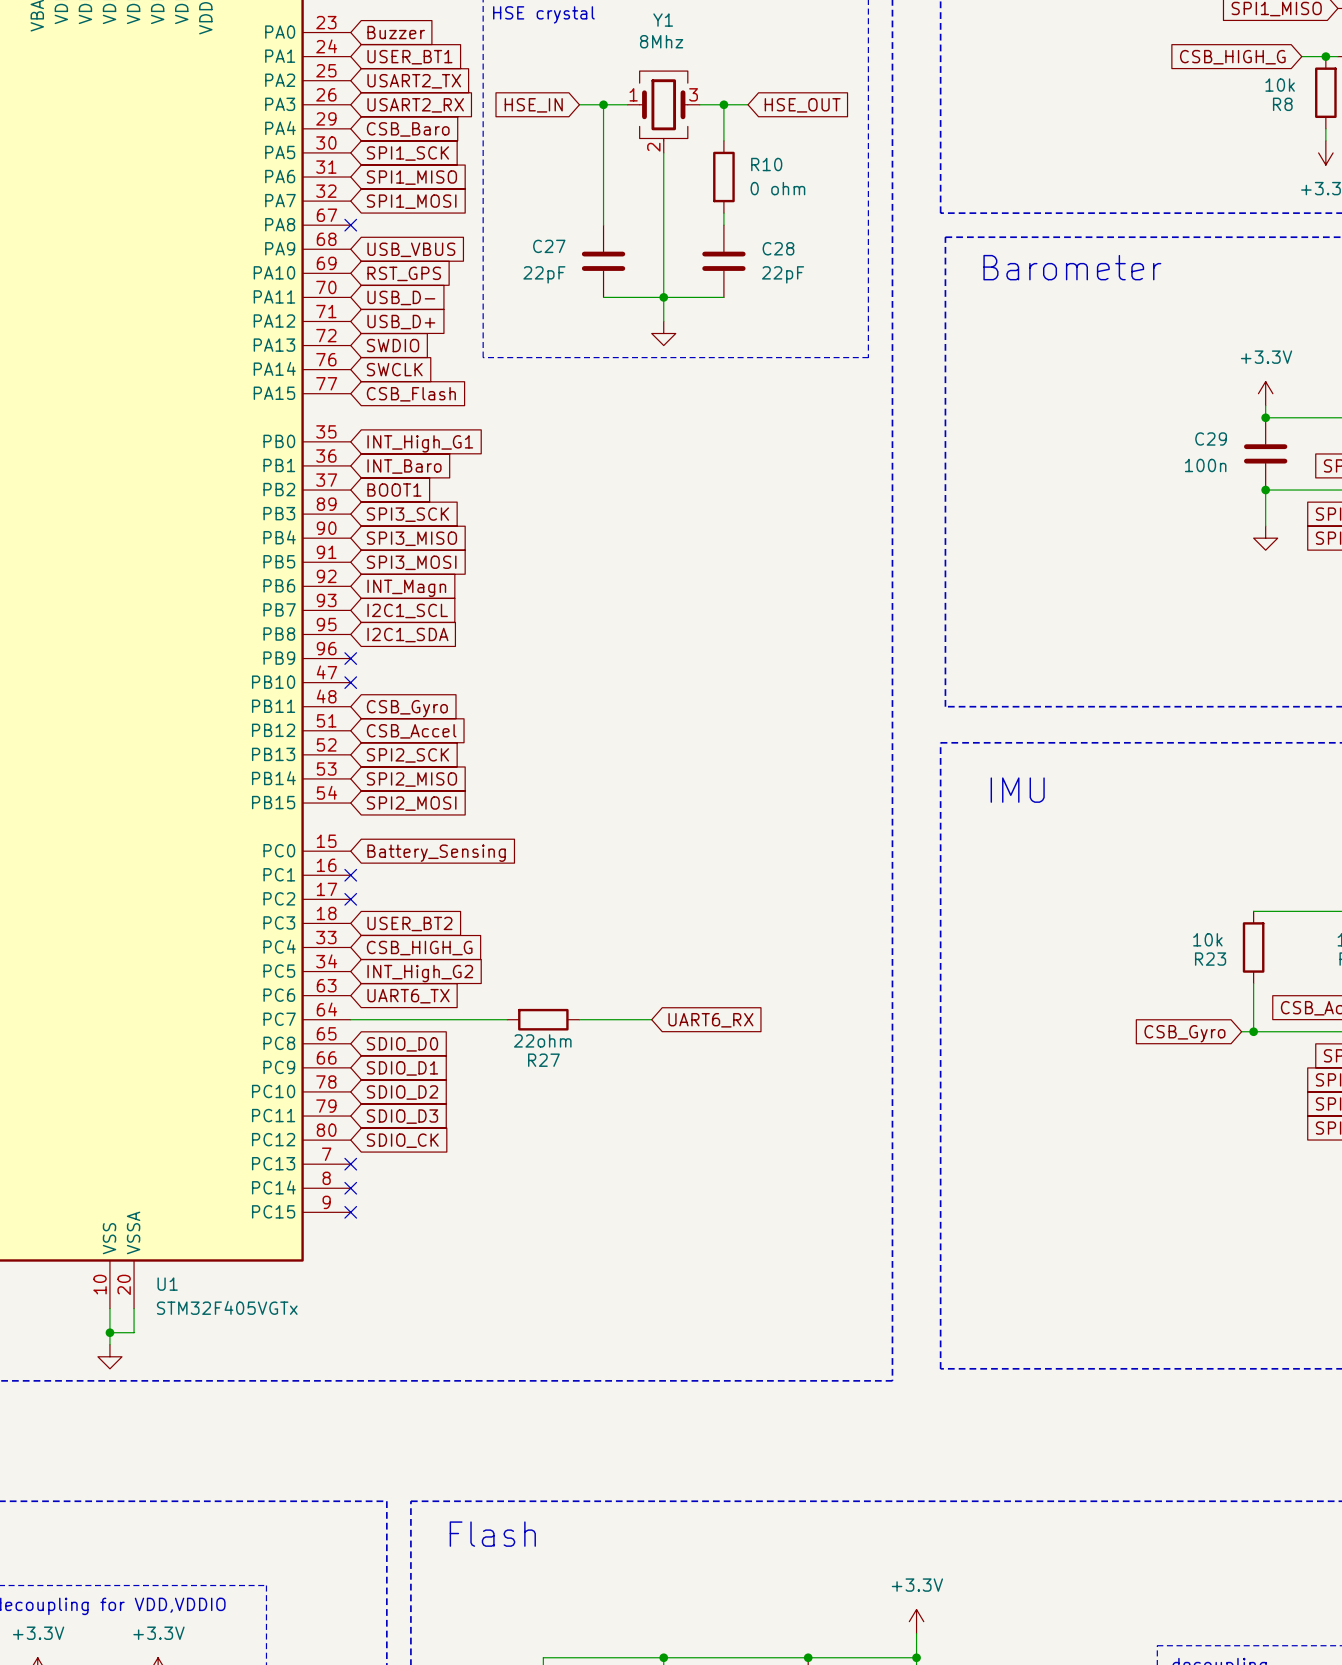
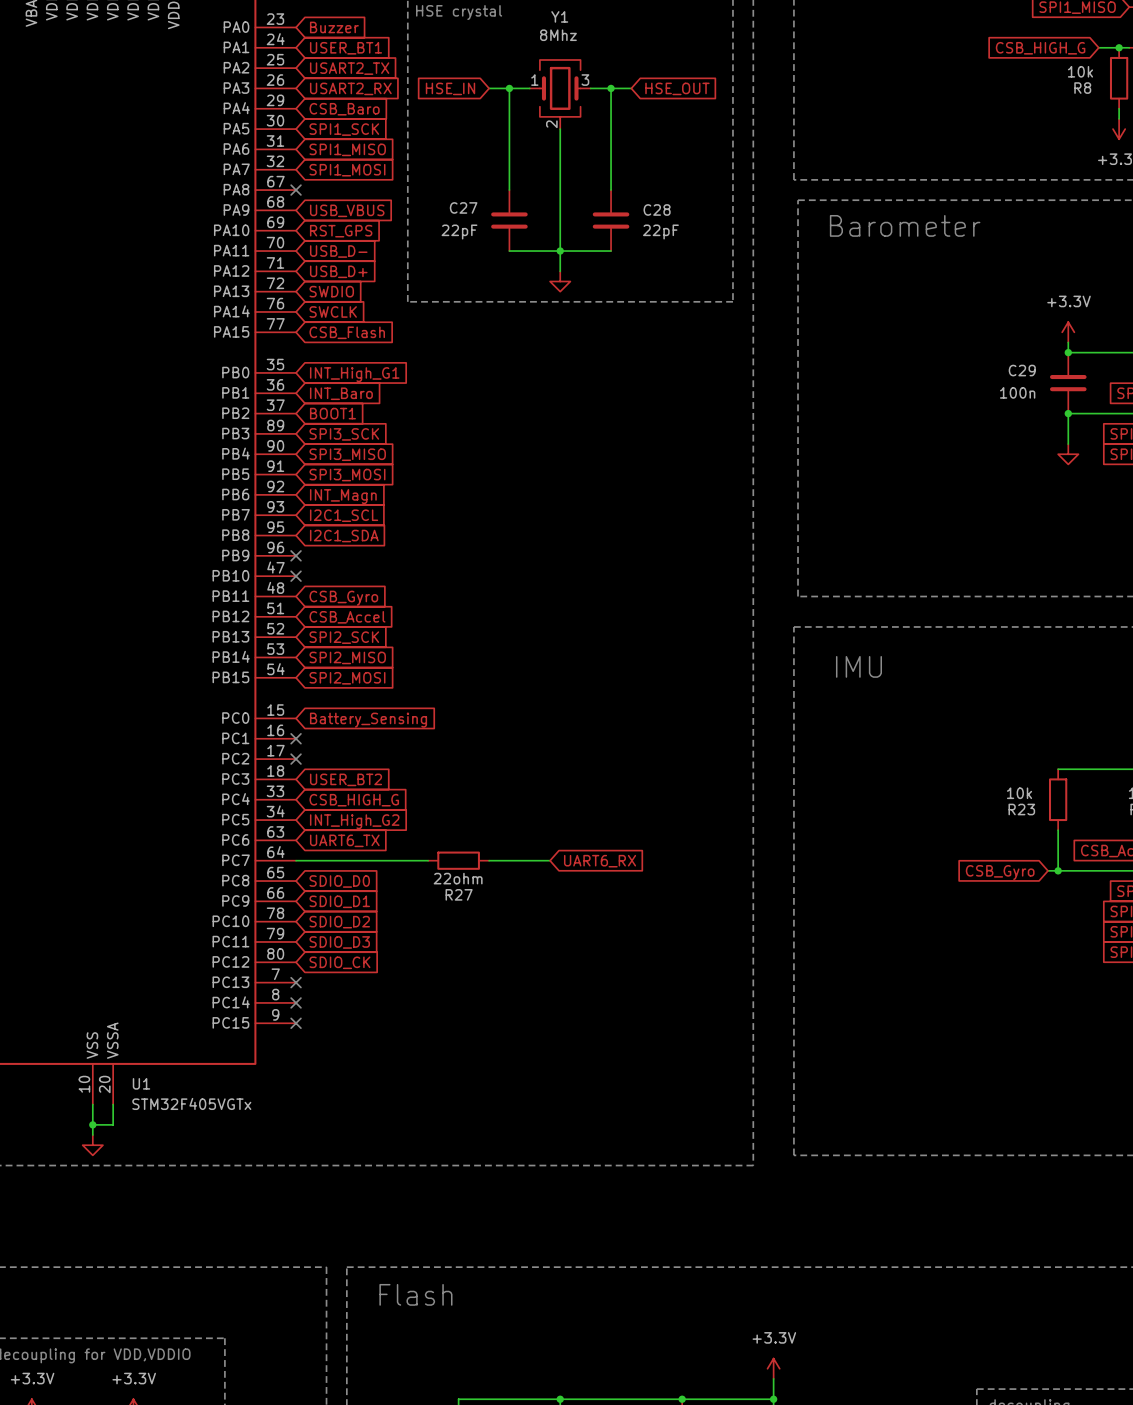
wire: none -> (611, 118) (611, 179)
R10: 0 ohm (723, 177) -> none

